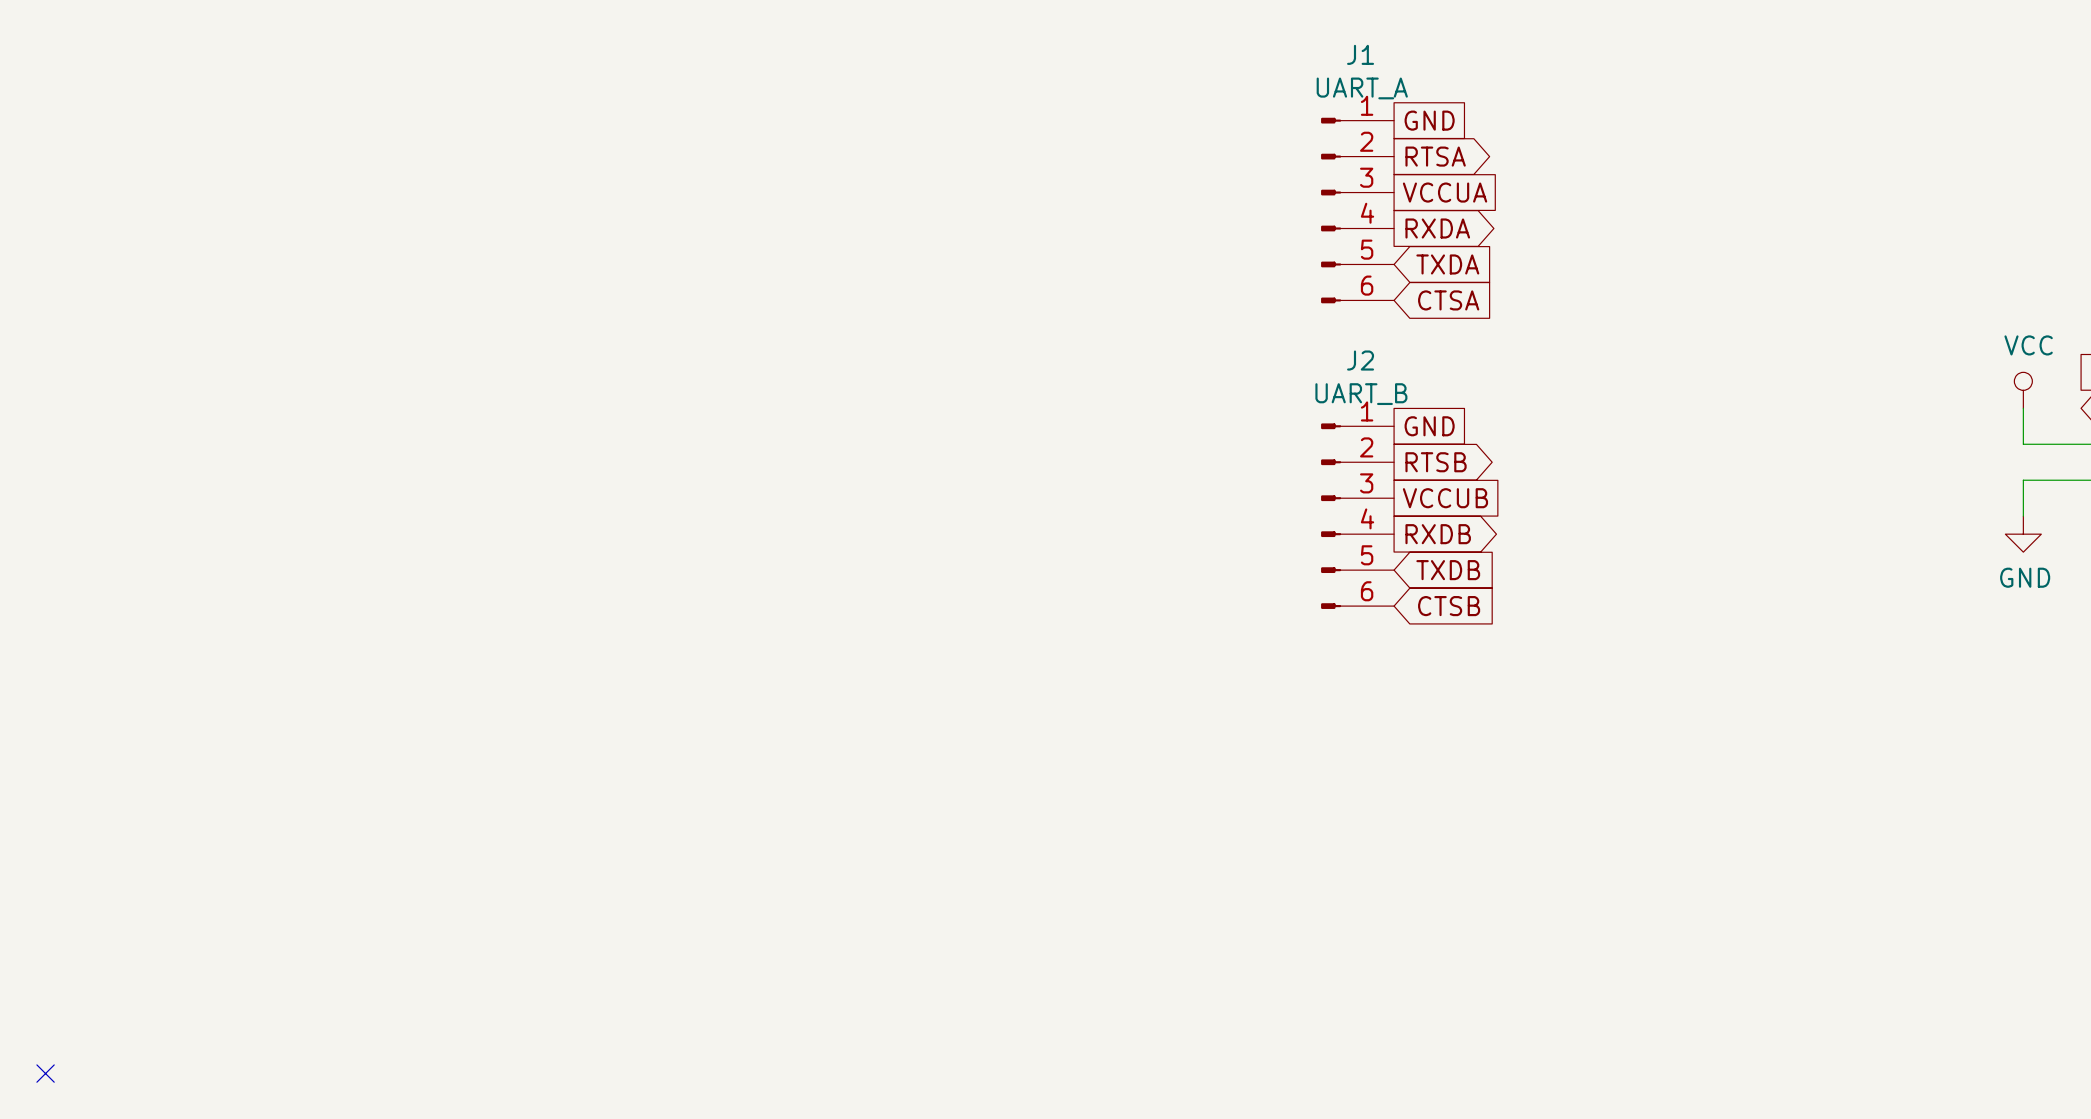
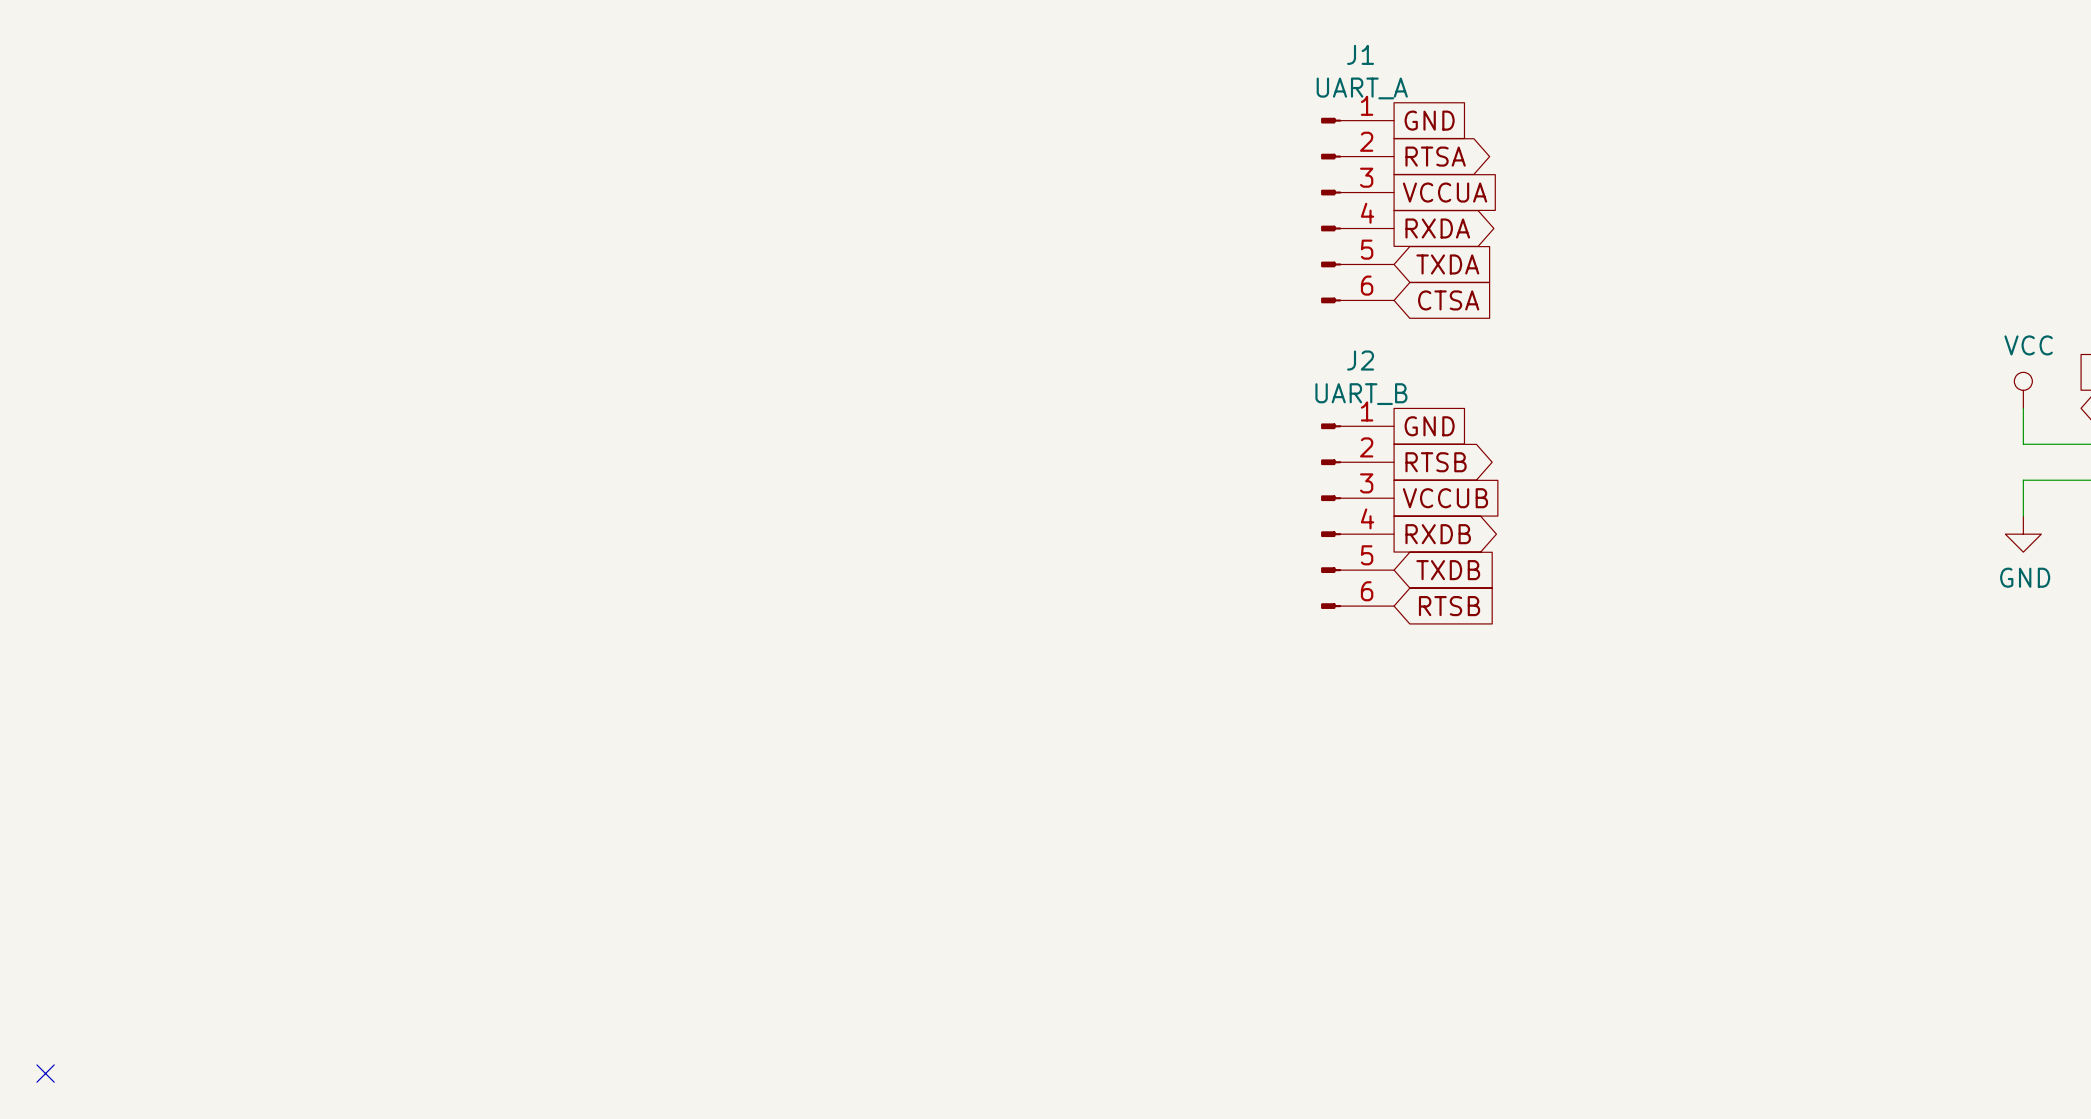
global label: CTSB (1449, 606) -> RTSB (1449, 606)

